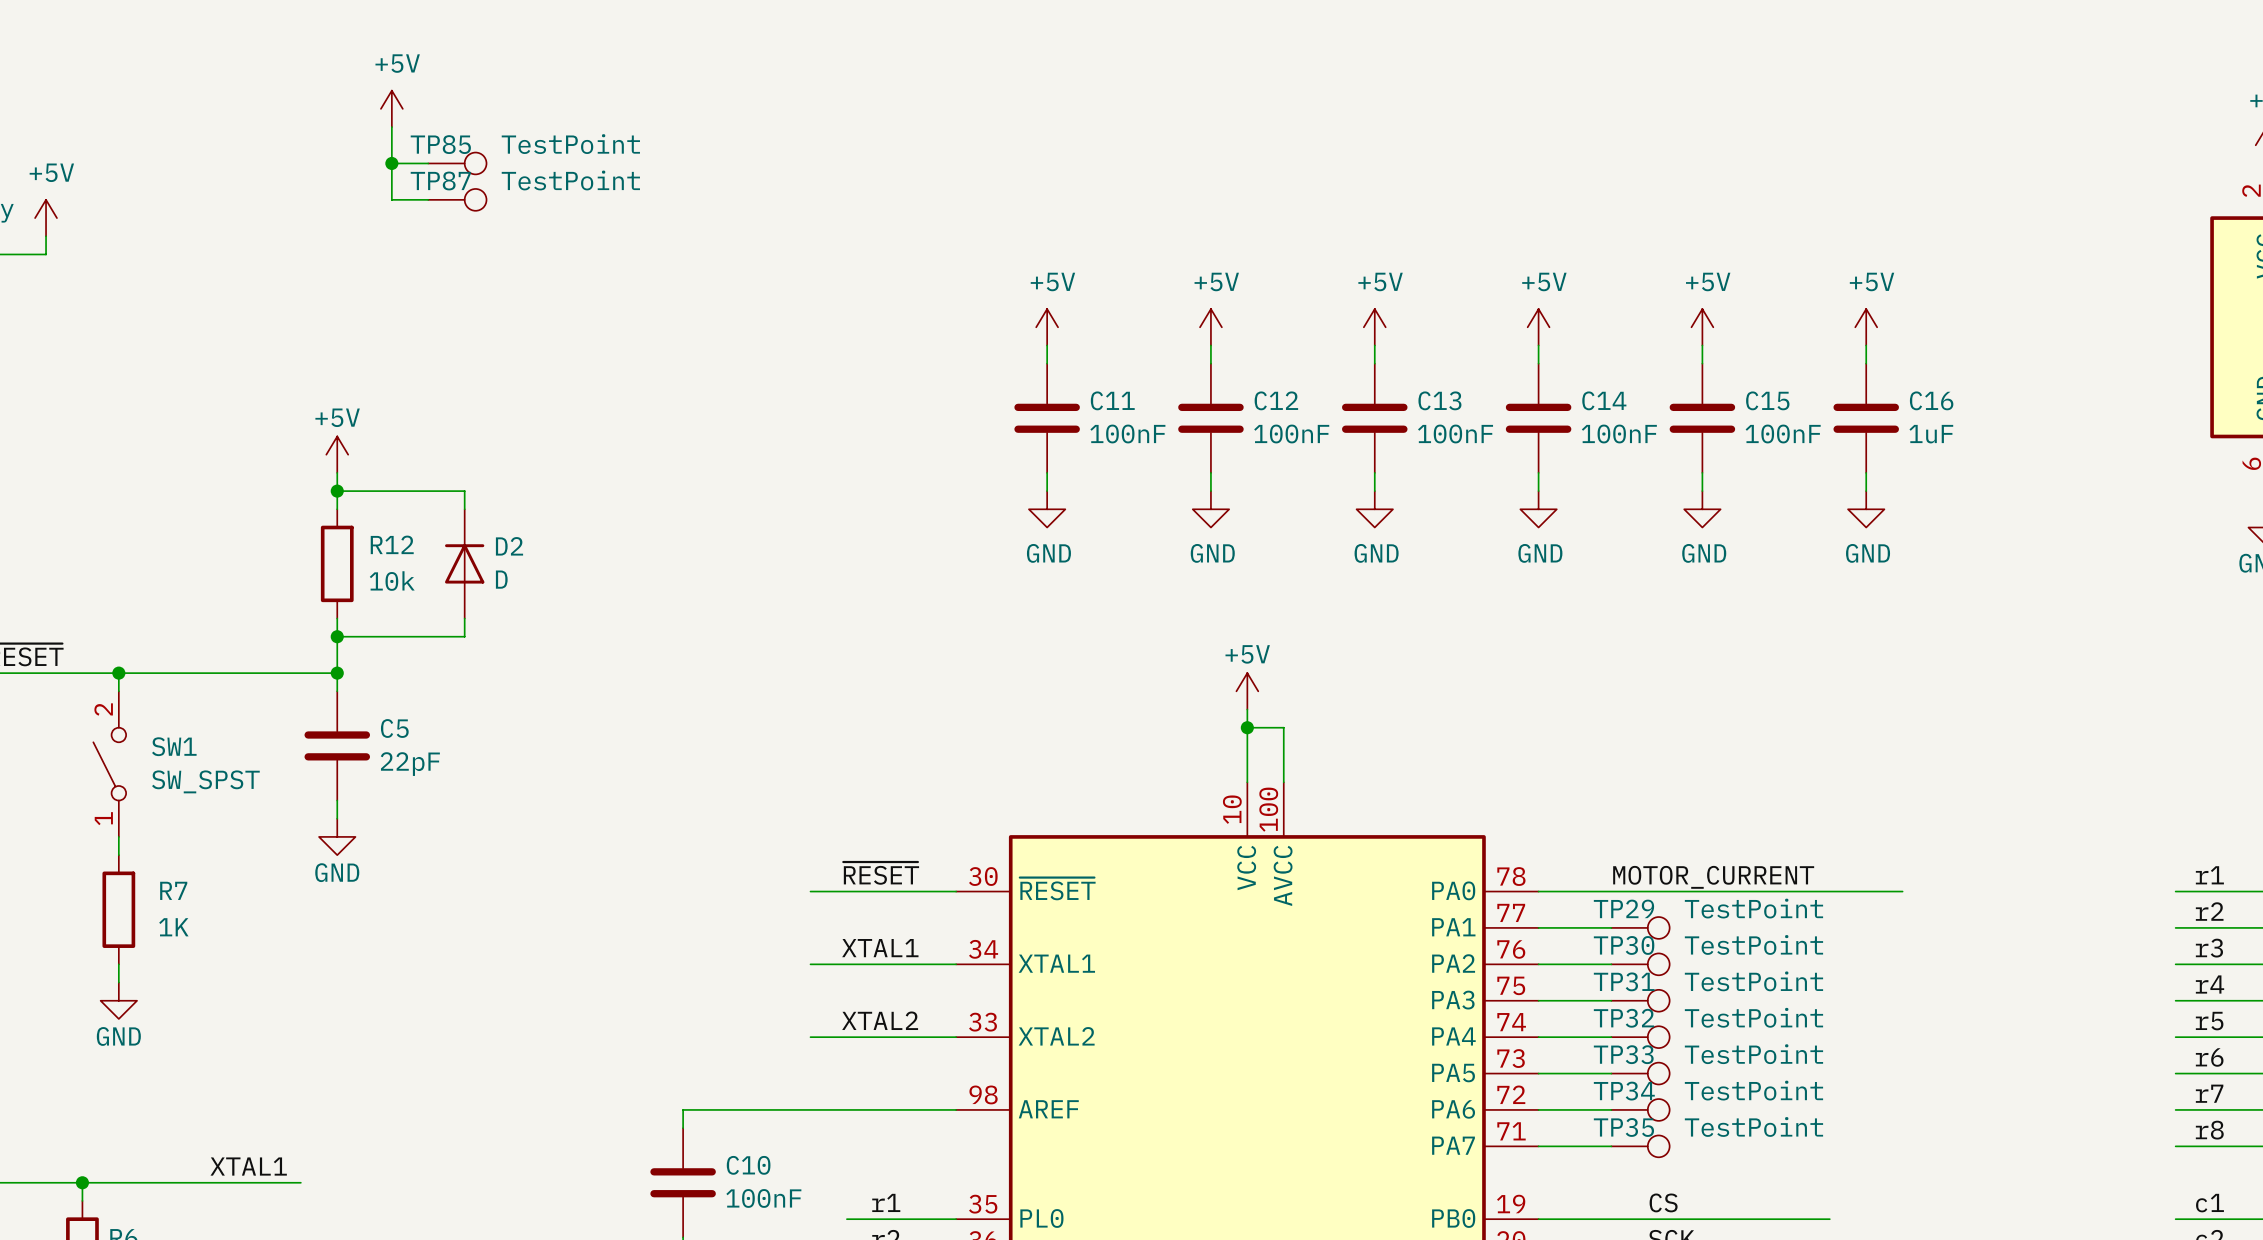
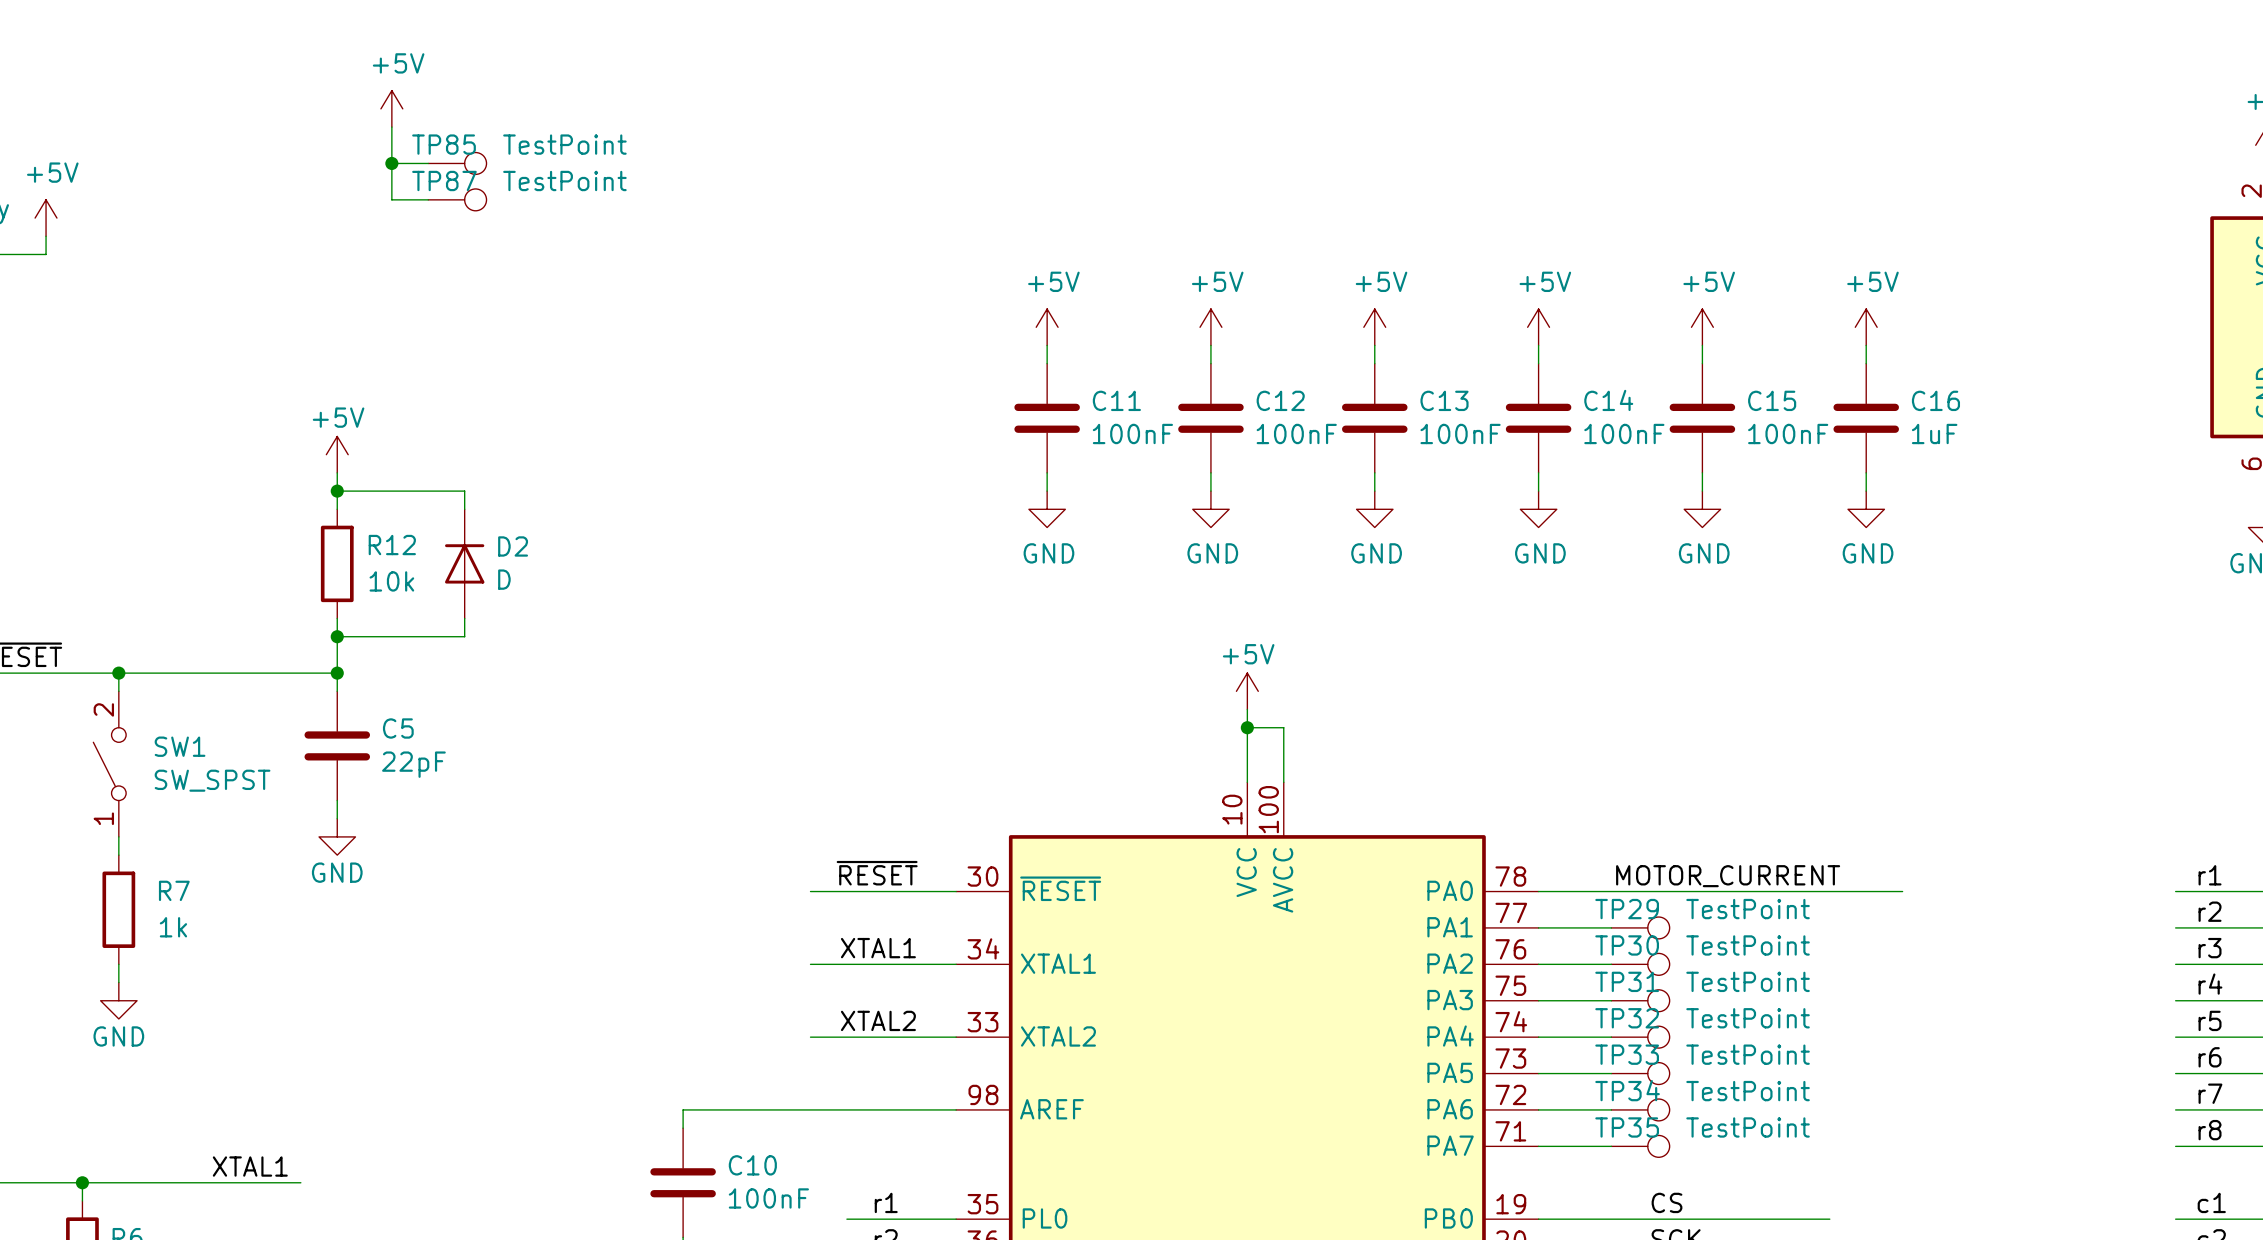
R7 value: 1K (173, 927) -> 1k (173, 927)

